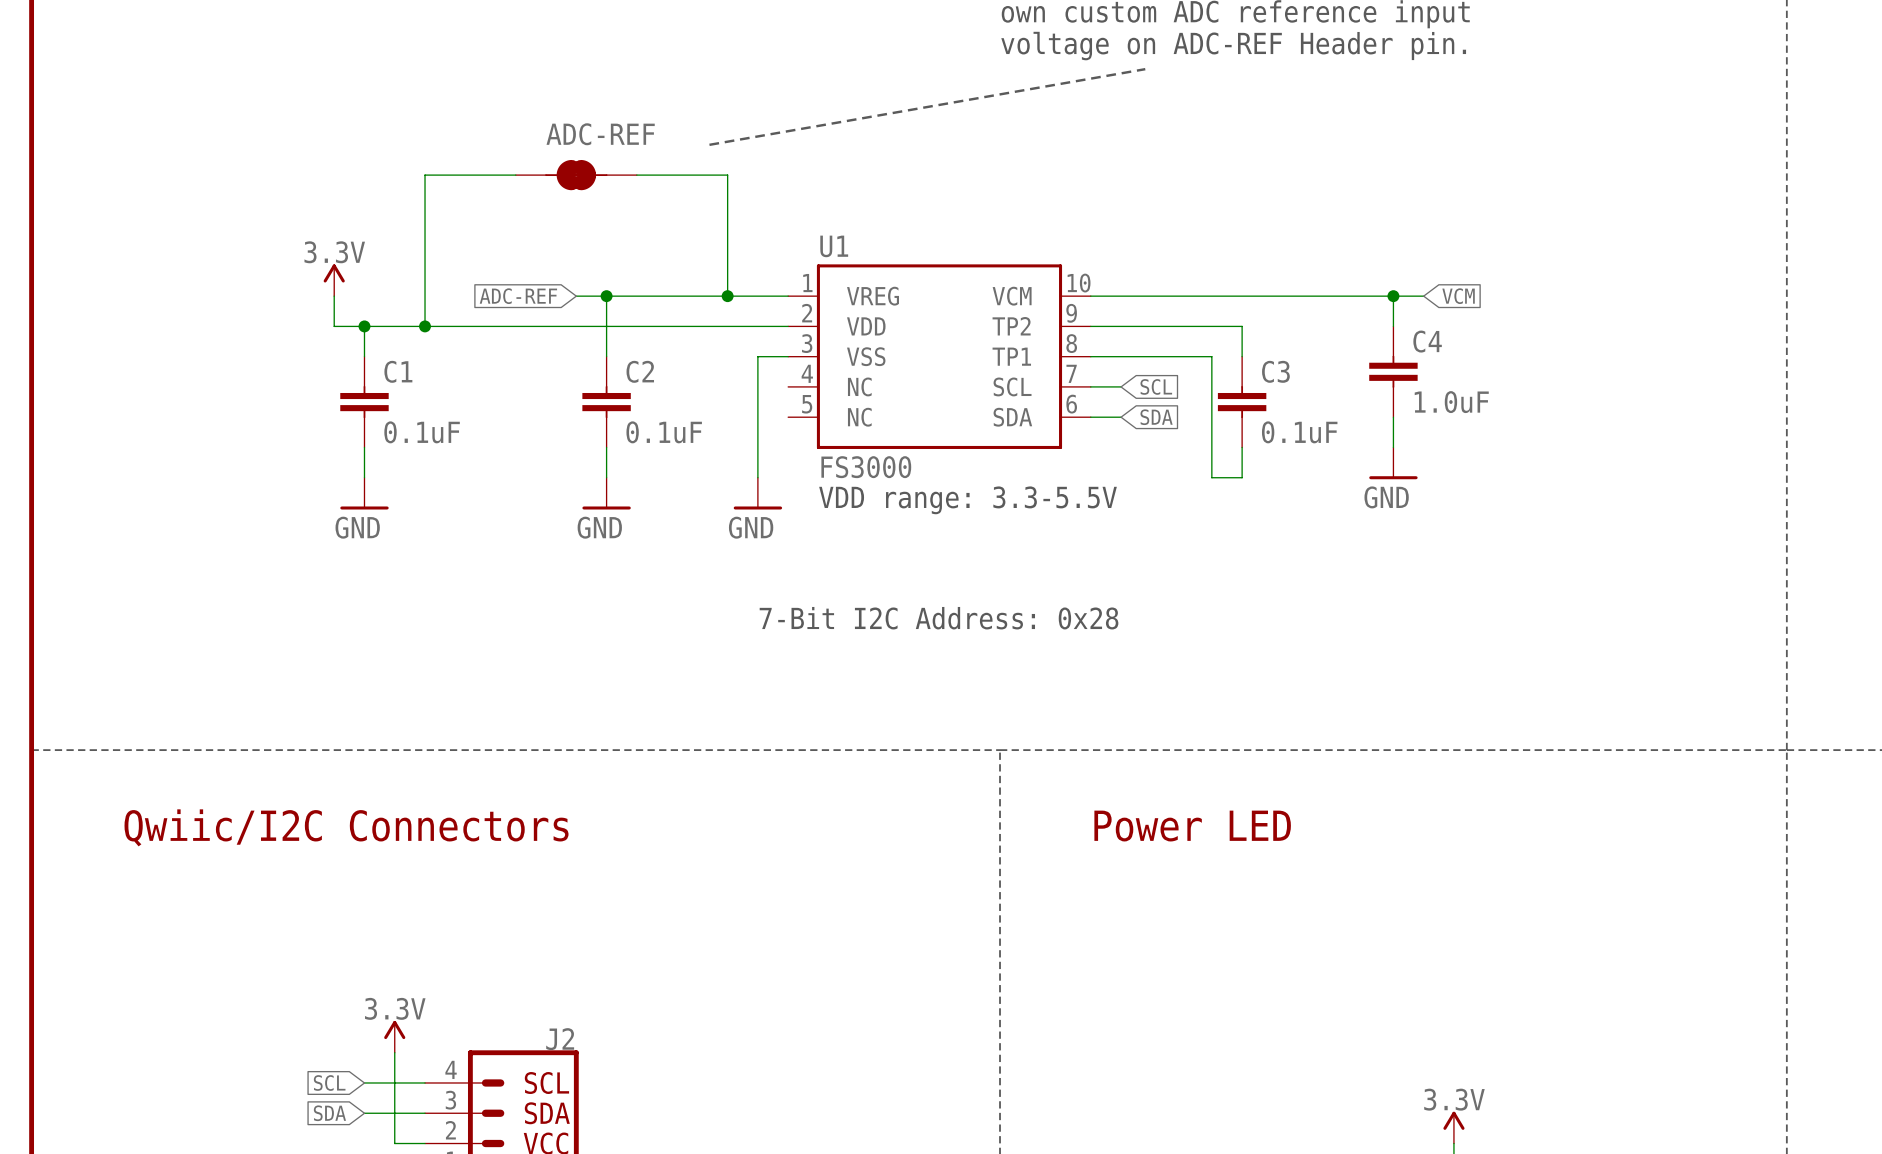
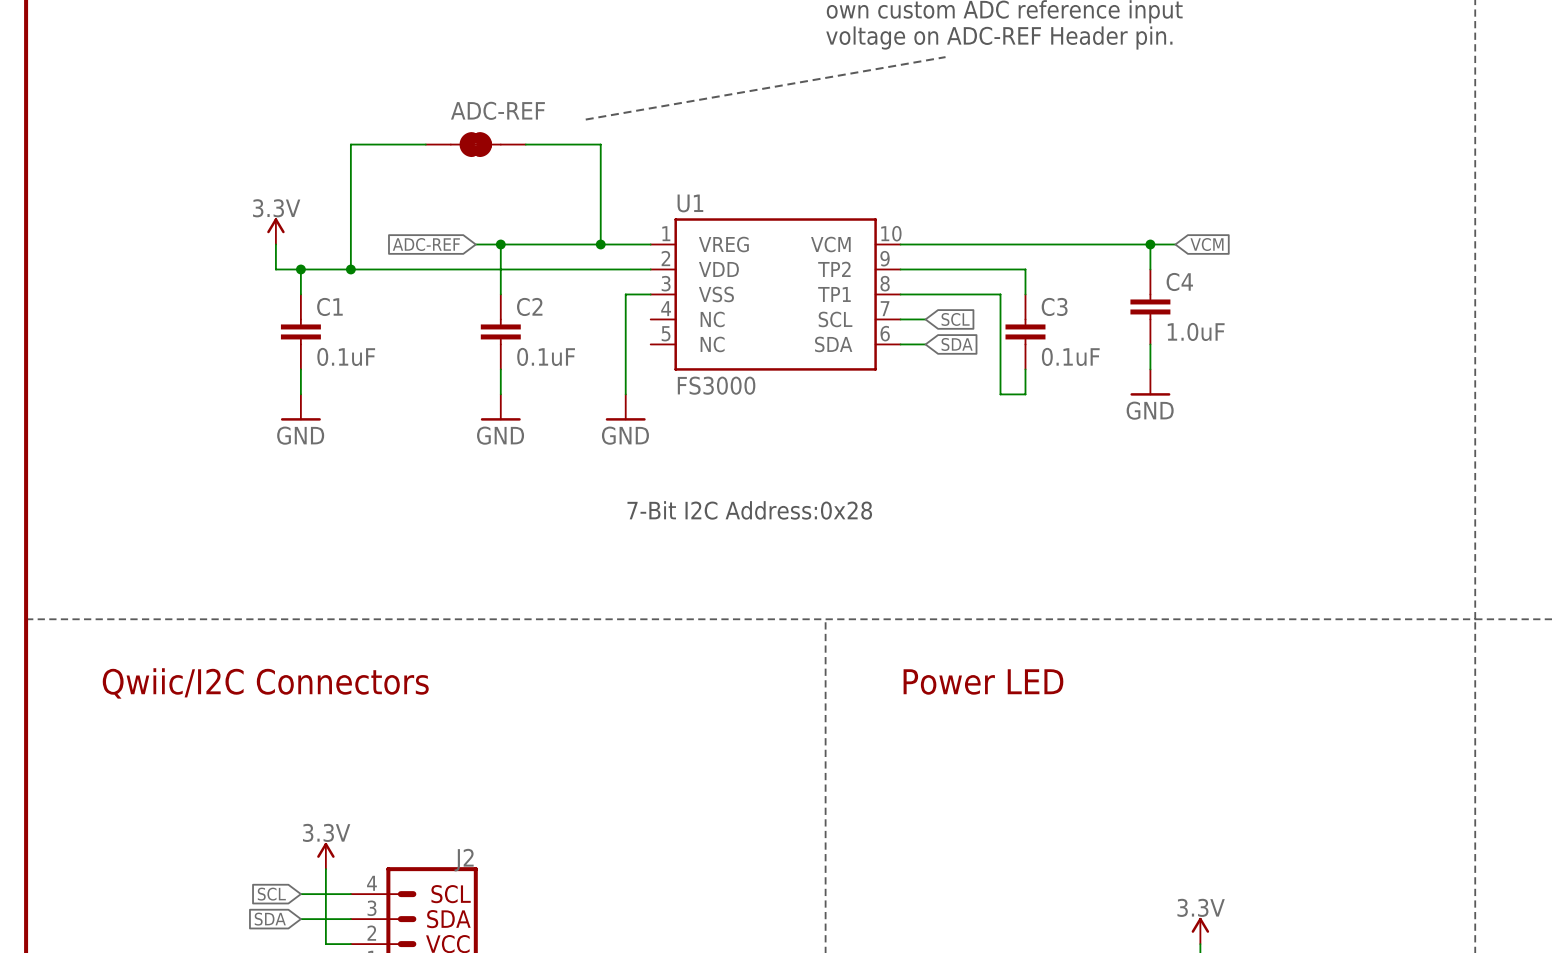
text: VDD range: 3.3-5.5V (968, 500) -> none
text: 7-Bit I2C Address: 0x28 (939, 618) -> 7-Bit I2C Address:0x28 (749, 510)

